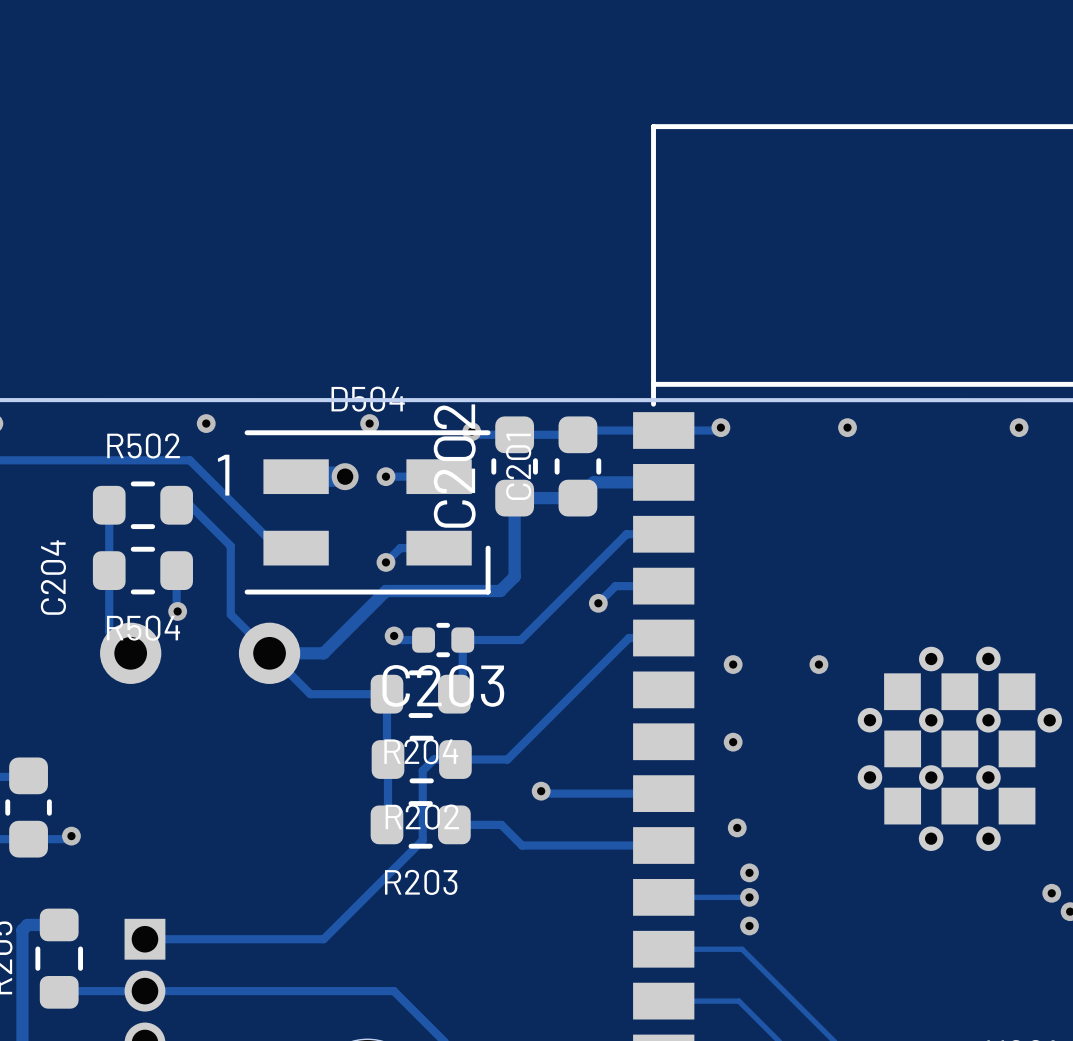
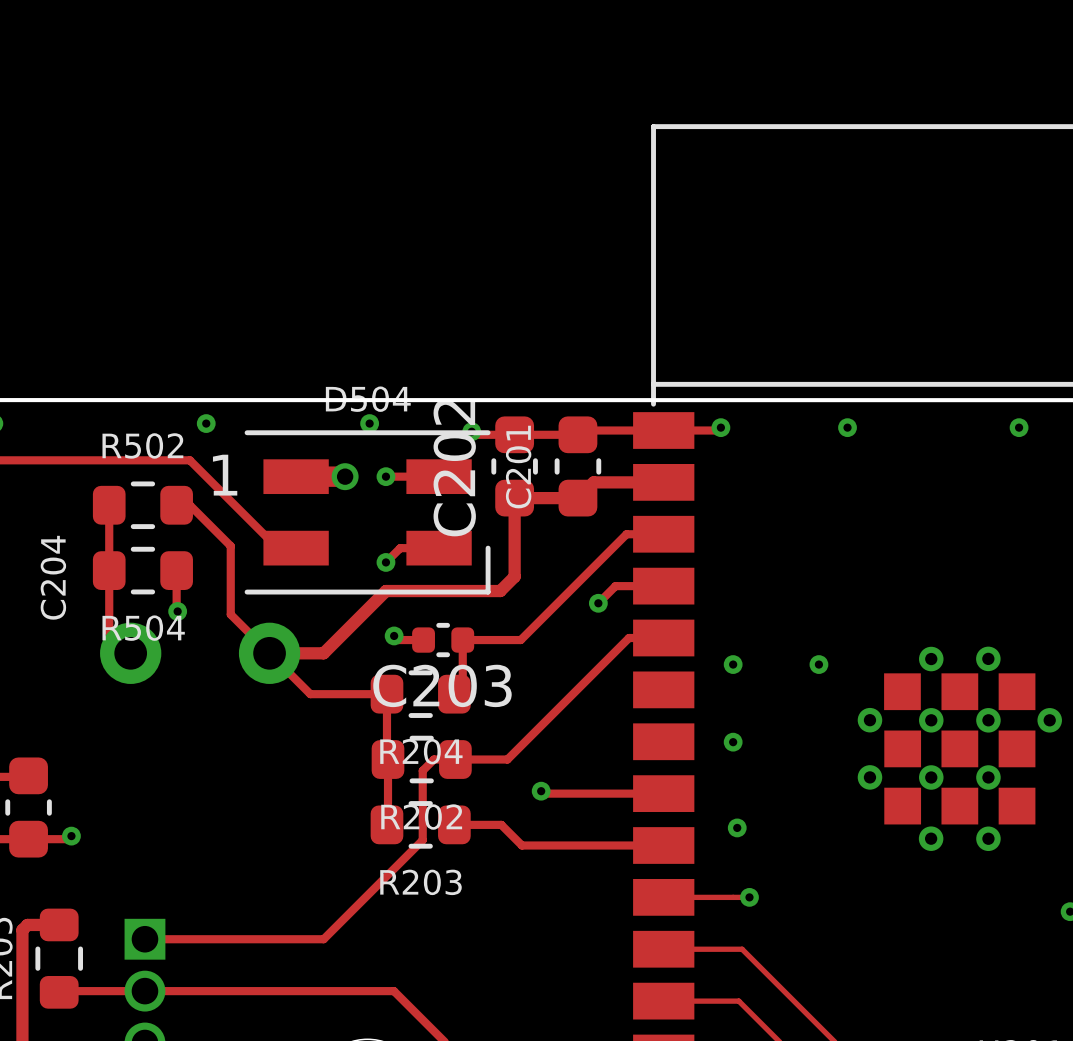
via: (749, 872) -> none
via: (1051, 893) -> none
via: (749, 925) -> none

